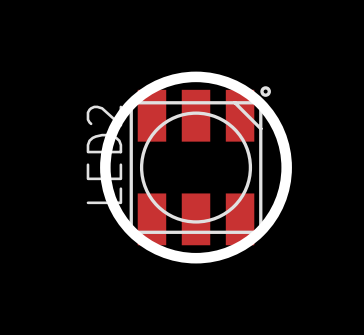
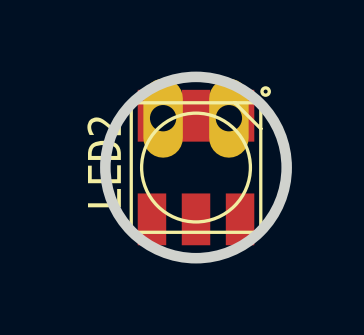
part: none -> (196, 118)

